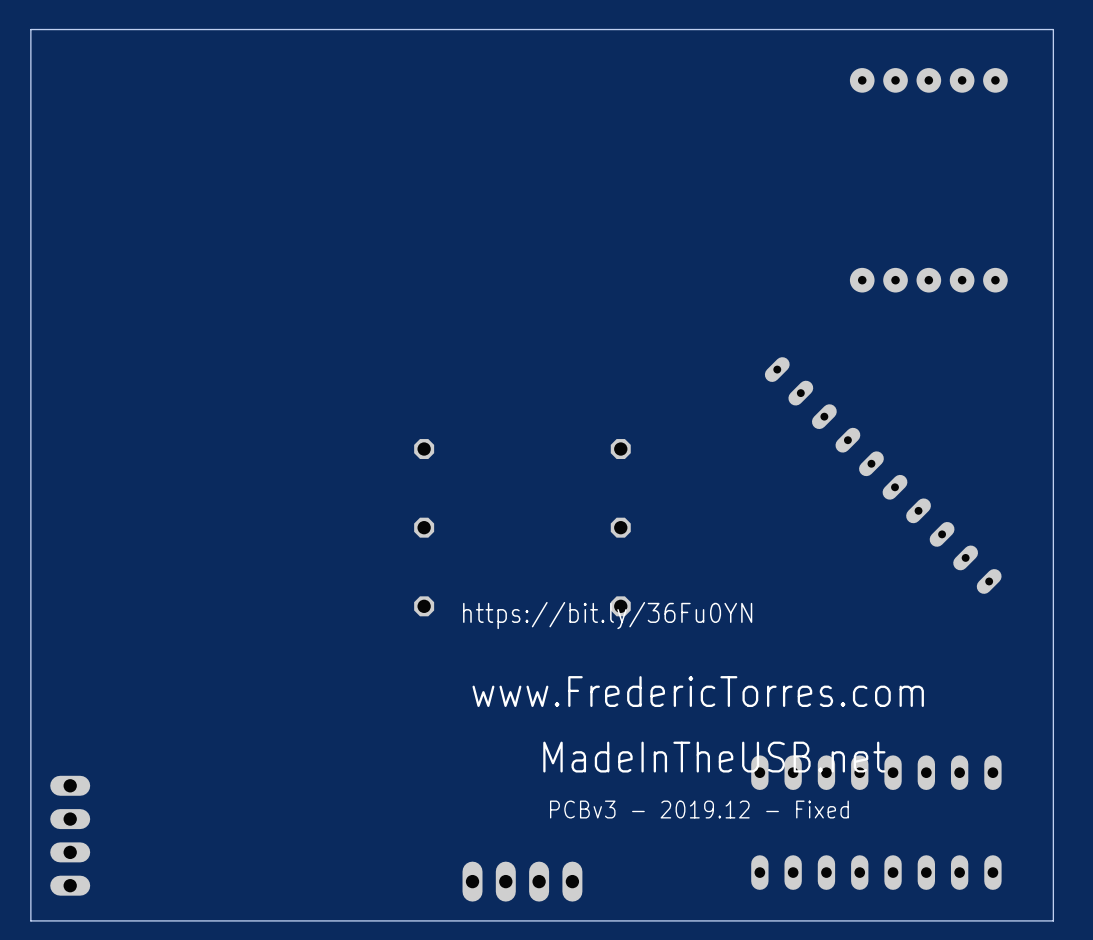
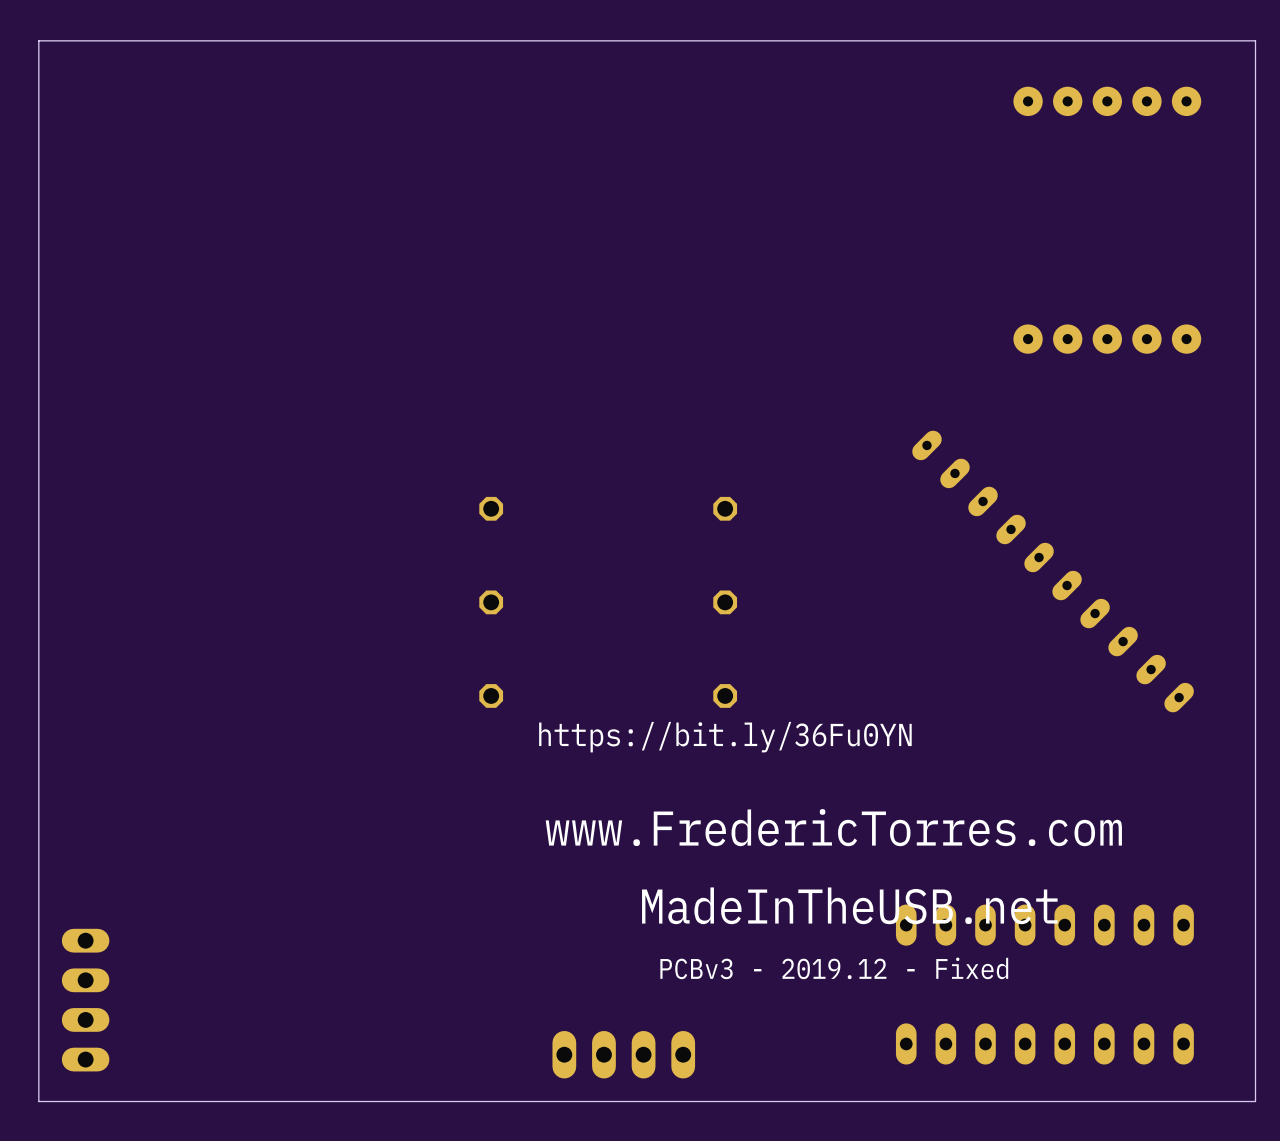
part: none -> (491, 508)
part: none -> (725, 508)
part: (424, 449) -> none
part: (620, 449) -> none
part: none -> (491, 602)
part: none -> (725, 602)
part: (424, 527) -> none
part: (620, 527) -> none
part: none -> (491, 695)
part: none -> (725, 695)
part: (424, 606) -> none
part: (620, 606) -> none

